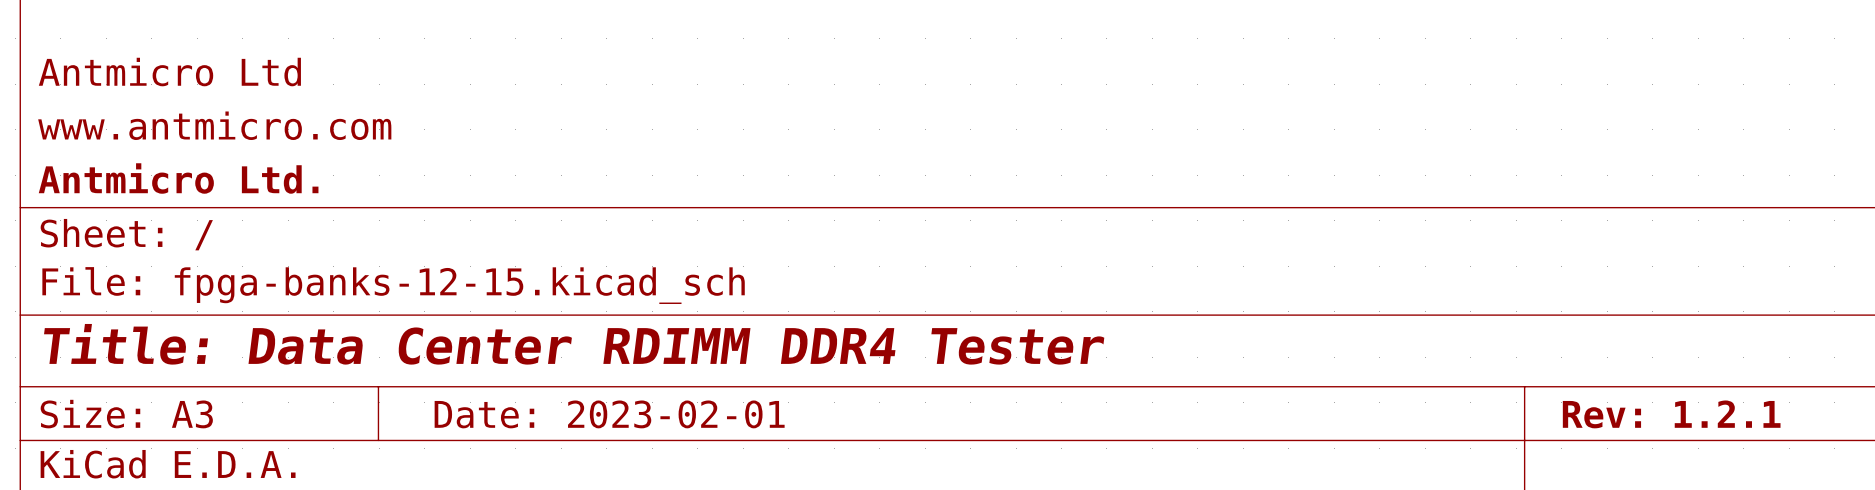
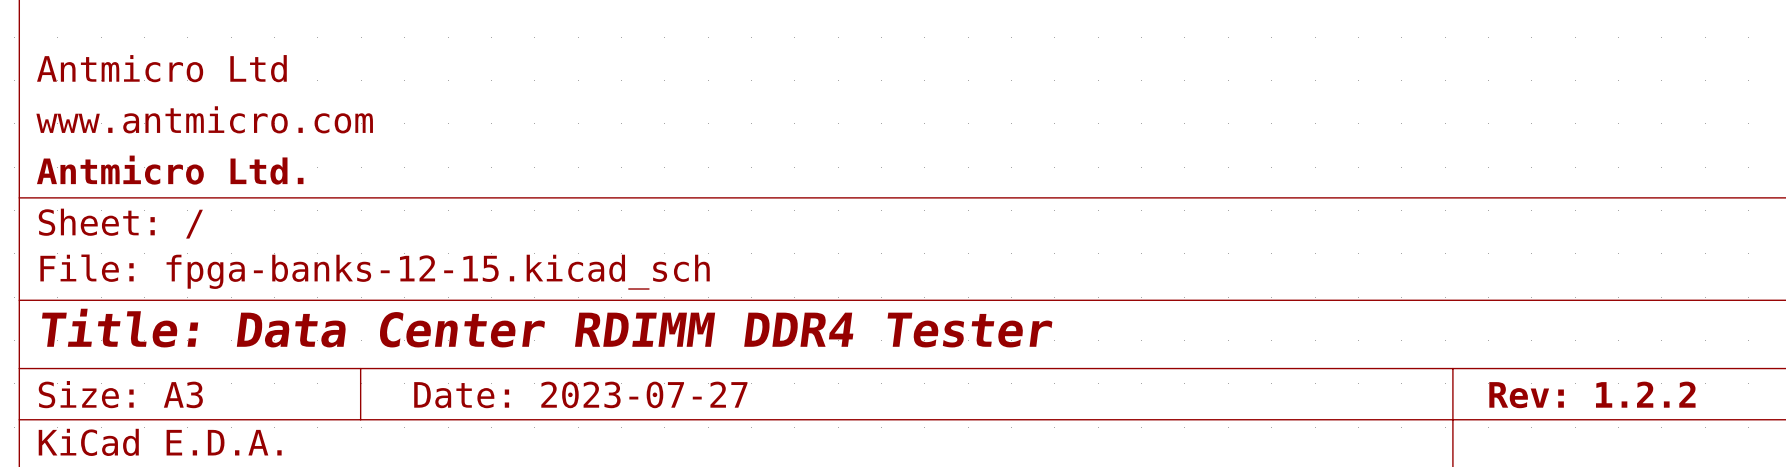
title block: Date: 2023-02-01 (609, 414) -> Date: 2023-07-27 (580, 394)
title block: Rev: 1.2.1 (1671, 414) -> Rev: 1.2.2 (1592, 394)

